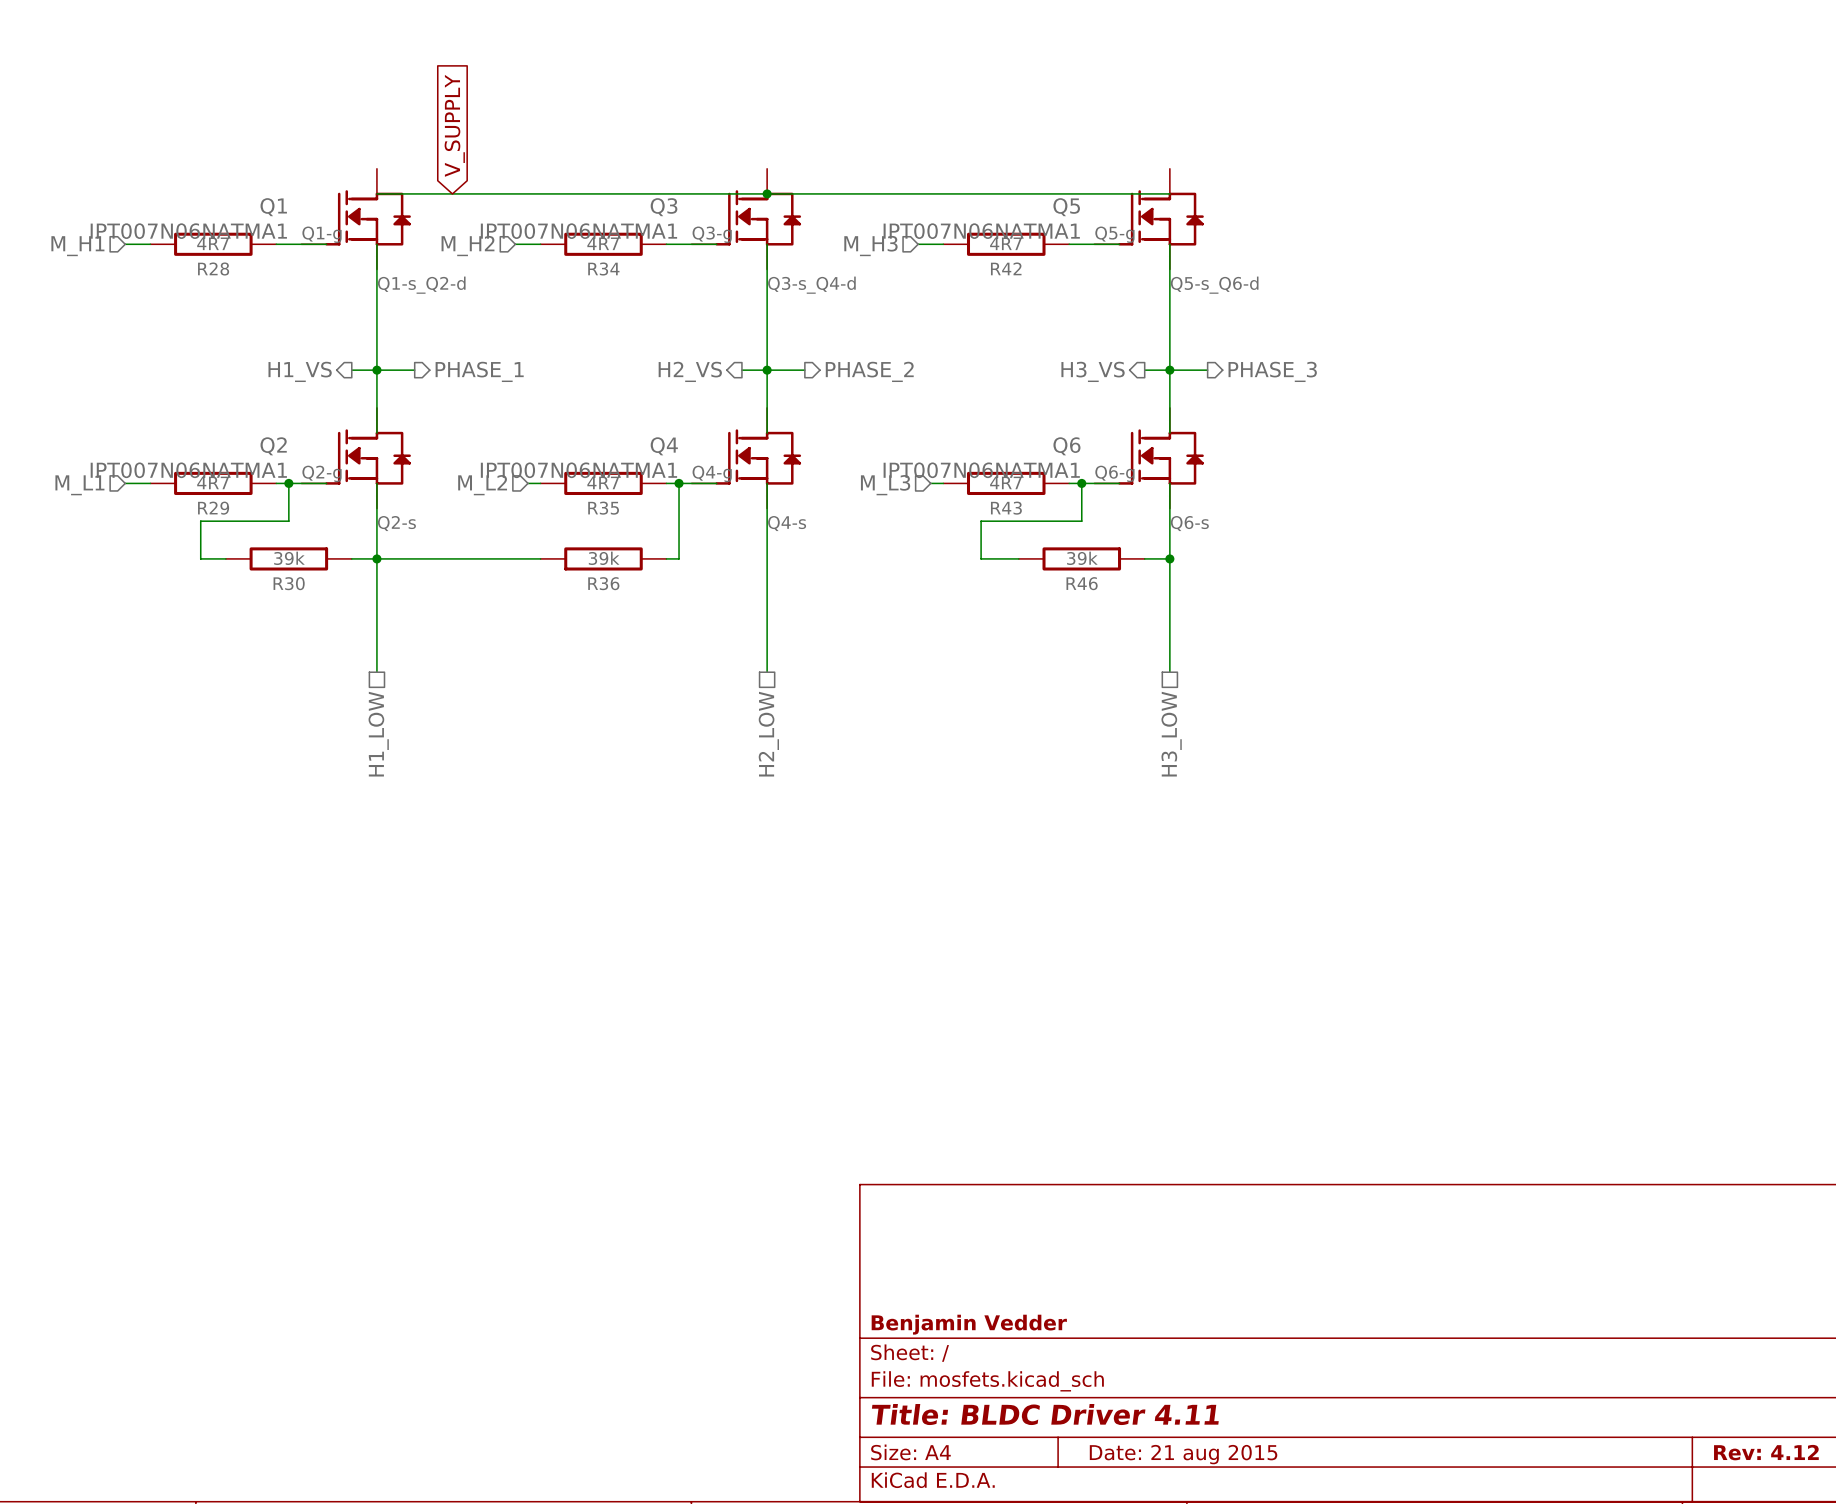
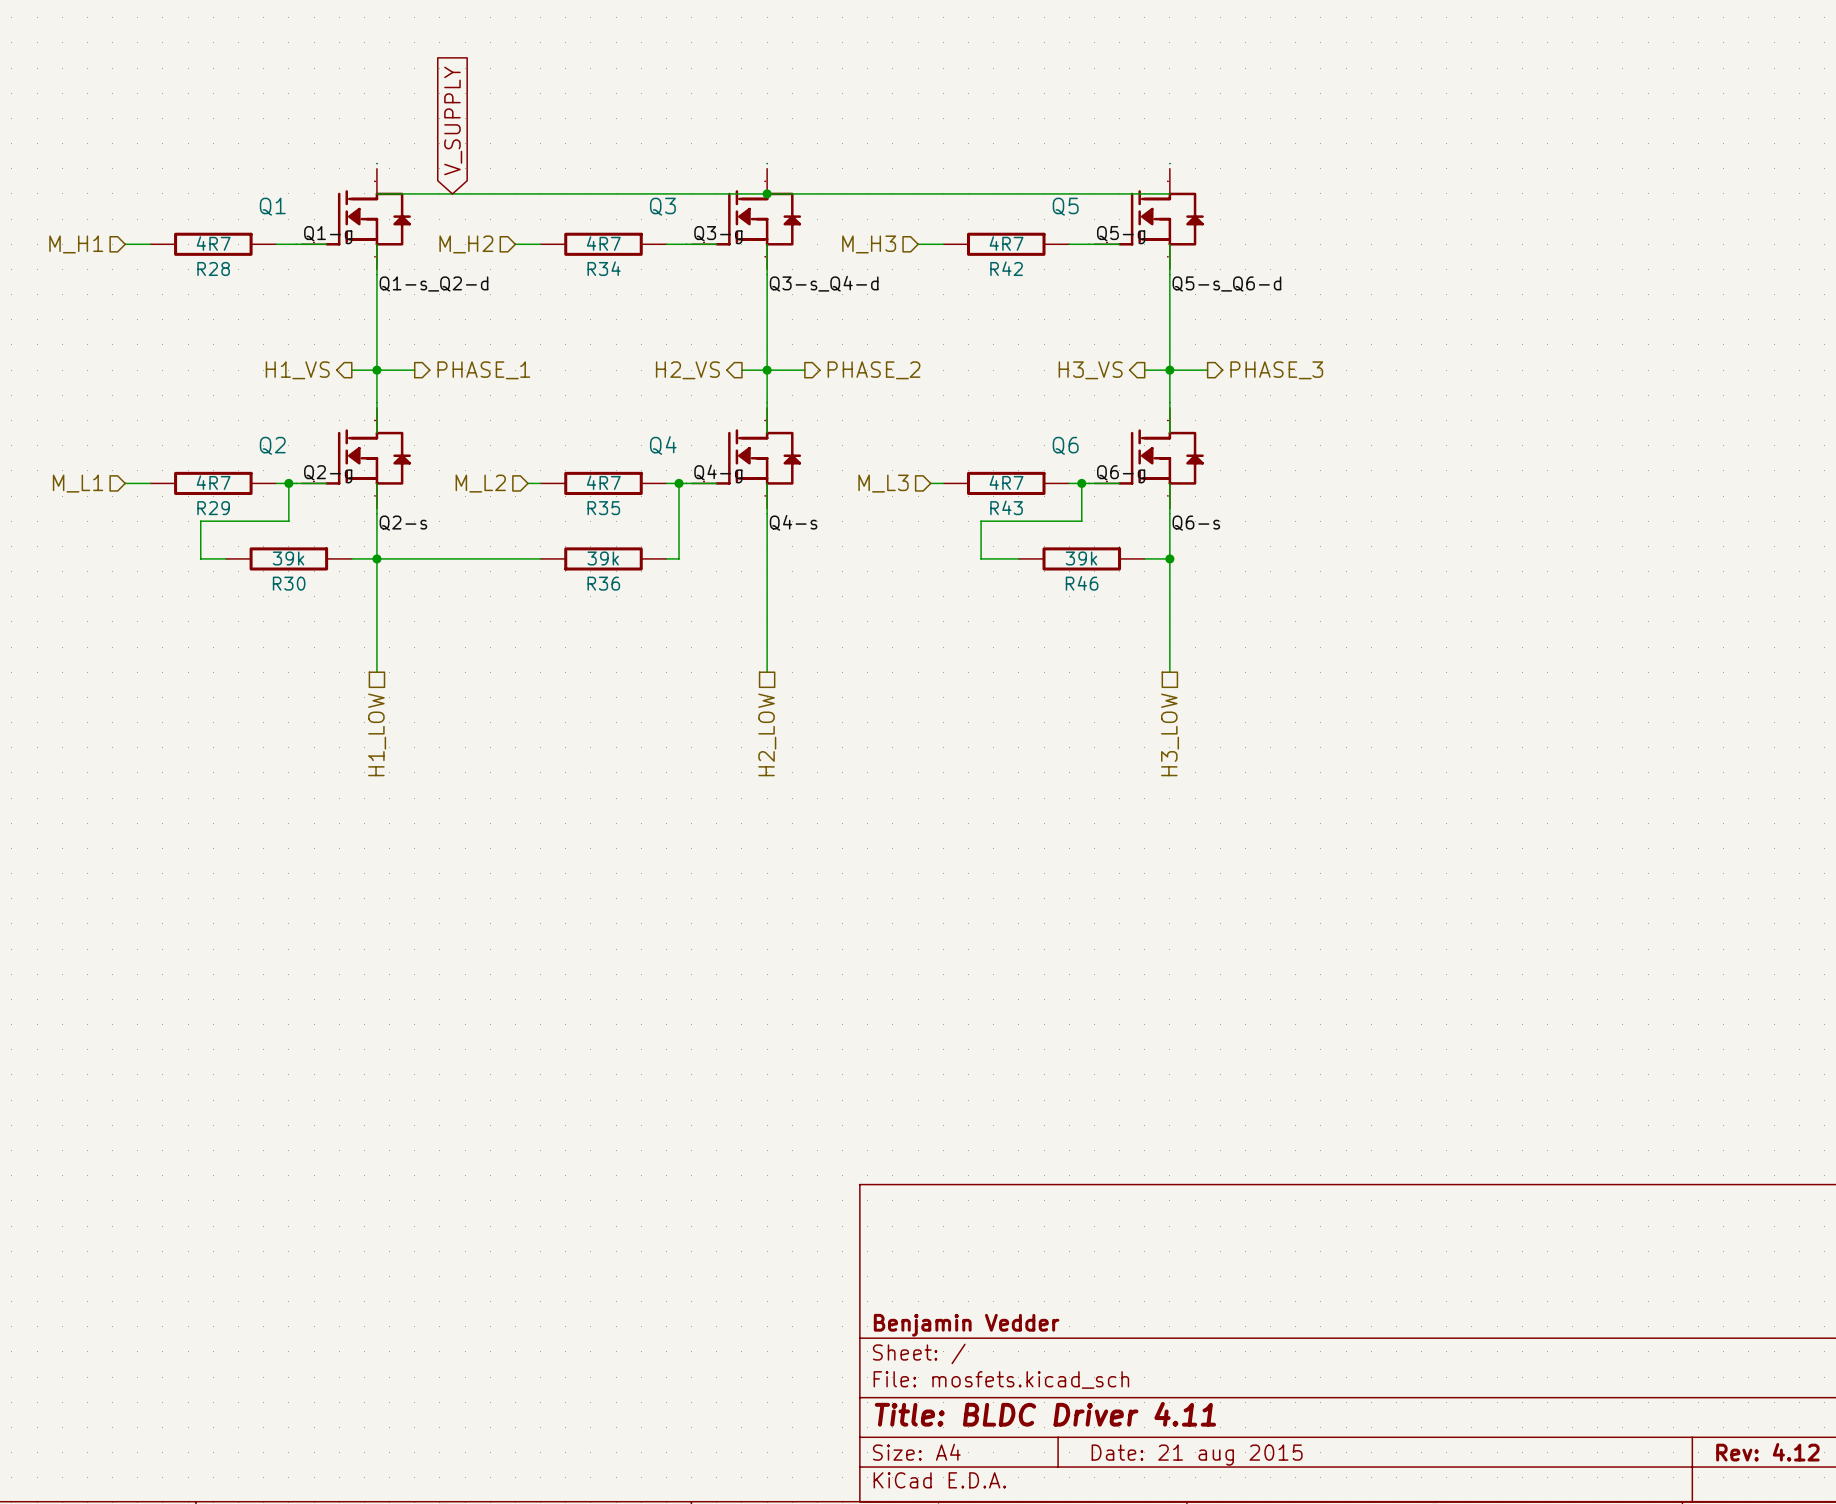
Q1 value: IPT007N06NATMA1 (188, 231) -> none
Q3 value: IPT007N06NATMA1 (578, 231) -> none
Q5 value: IPT007N06NATMA1 (981, 231) -> none
Q2 value: IPT007N06NATMA1 (188, 470) -> none
Q4 value: IPT007N06NATMA1 (578, 470) -> none
Q6 value: IPT007N06NATMA1 (981, 470) -> none

